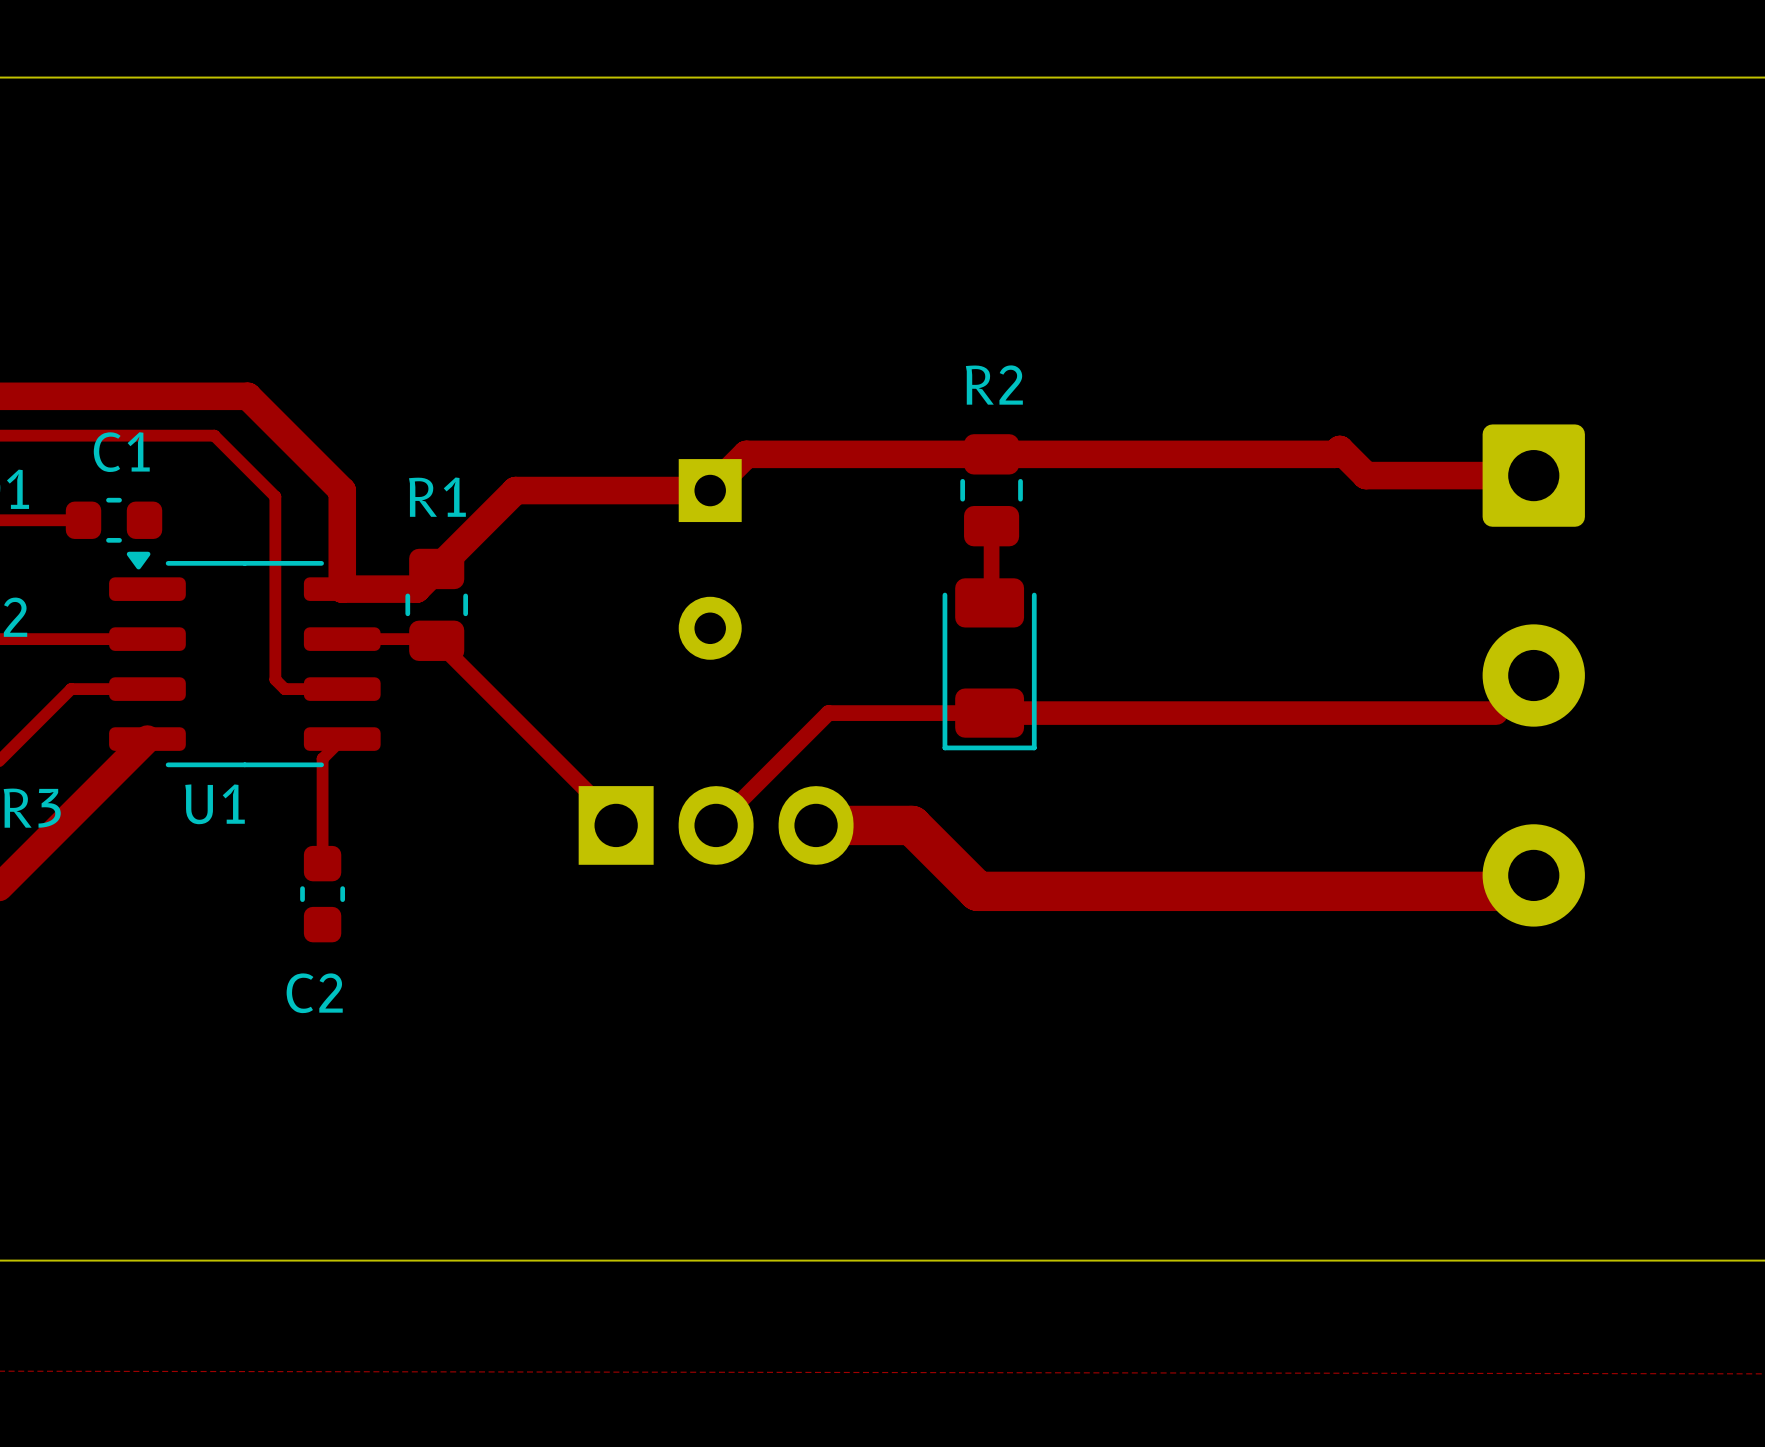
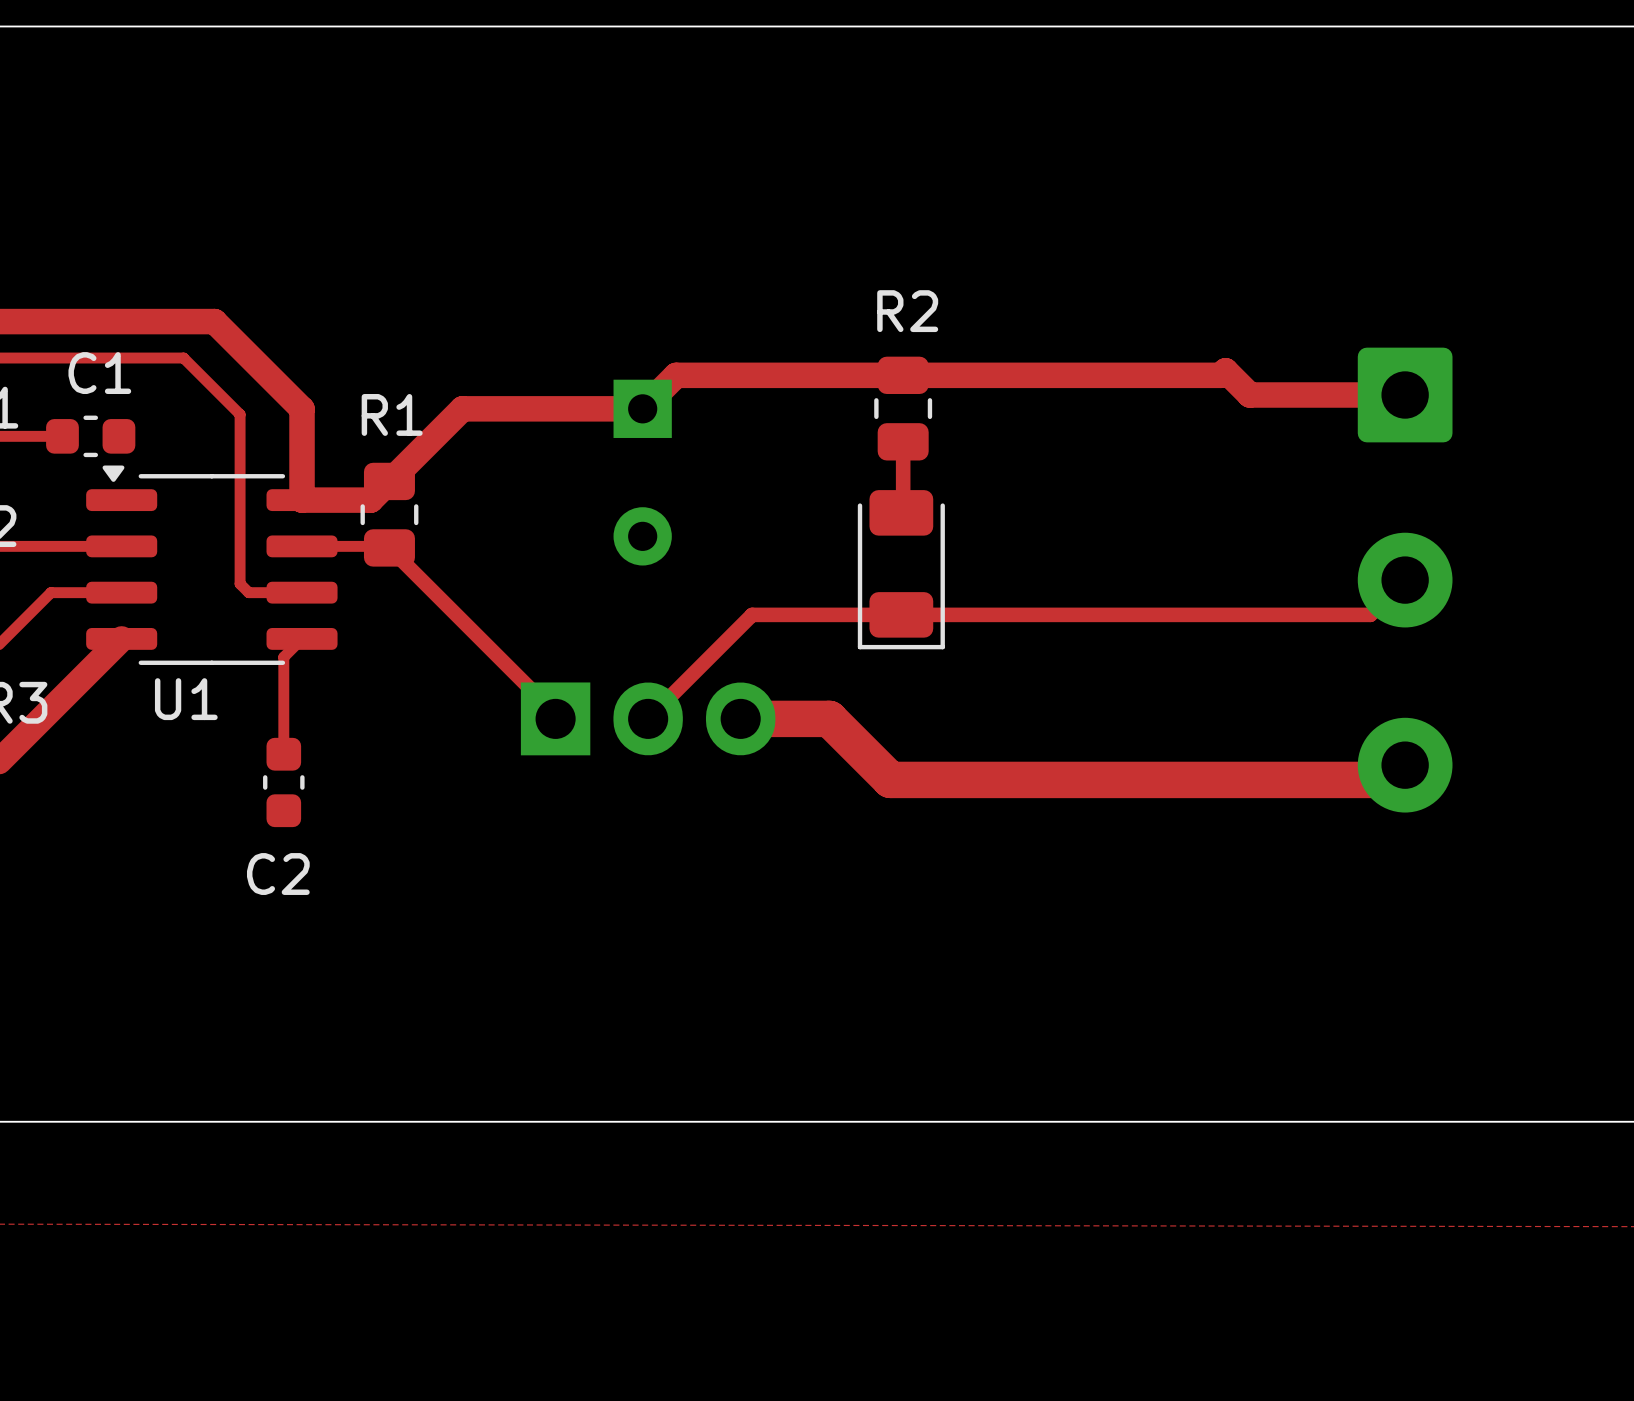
top track width: thick (989, 713) (1496, 713) -> thin (901, 614) (1370, 614)

